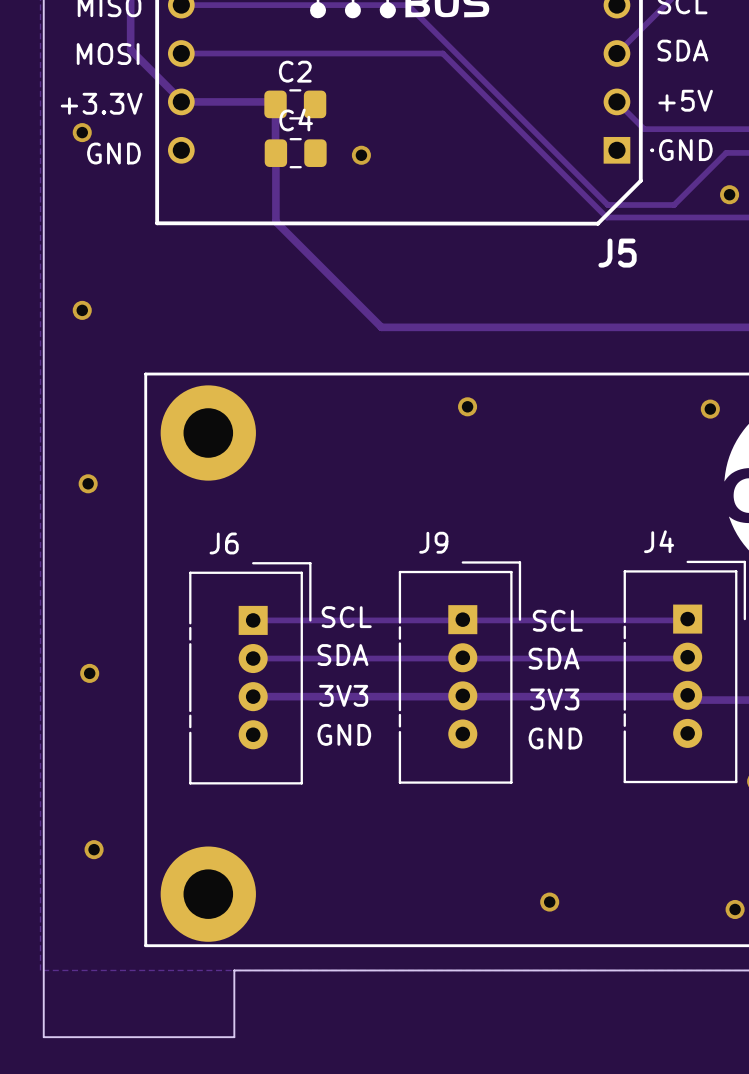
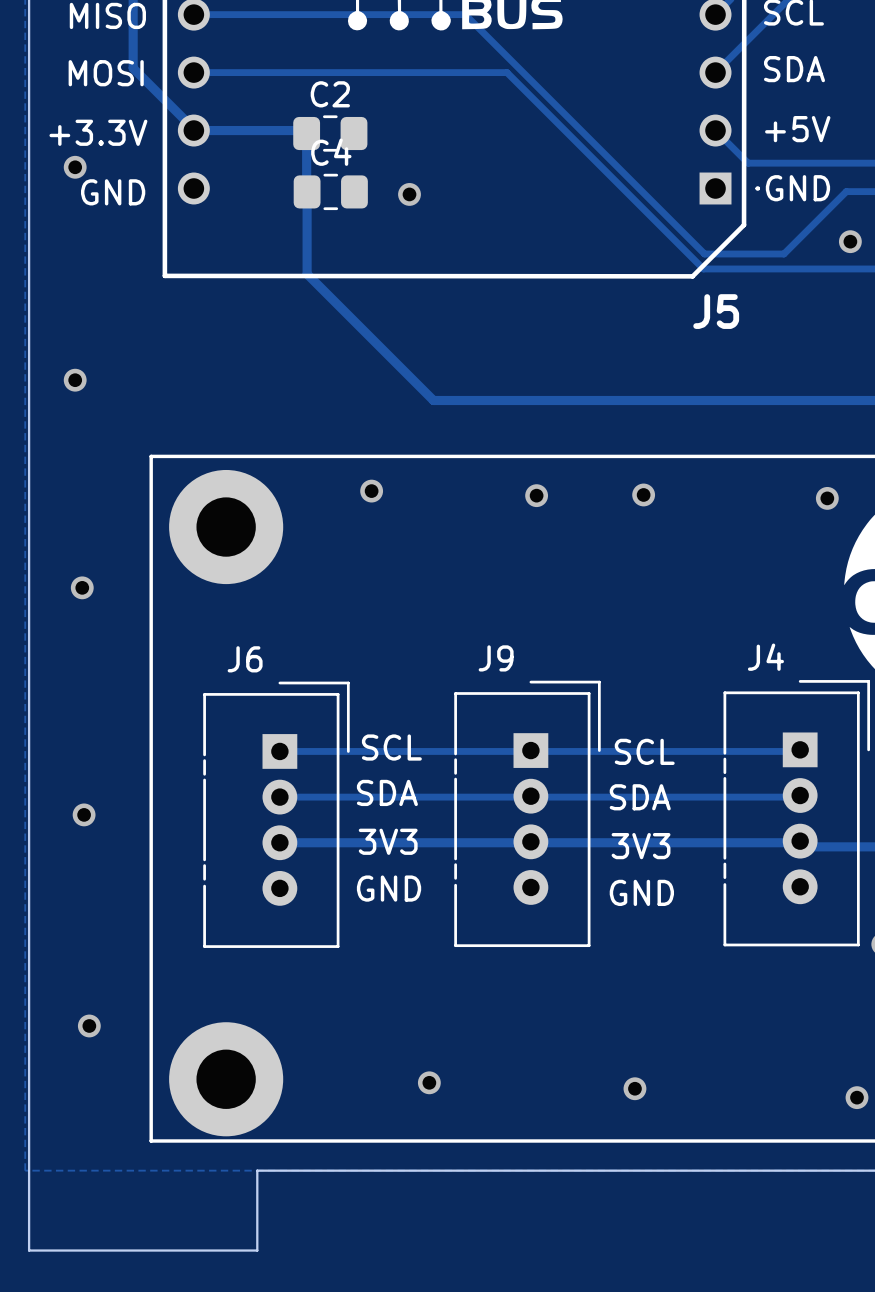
via: none -> (371, 491)
via: none -> (643, 494)
via: none -> (429, 1082)

